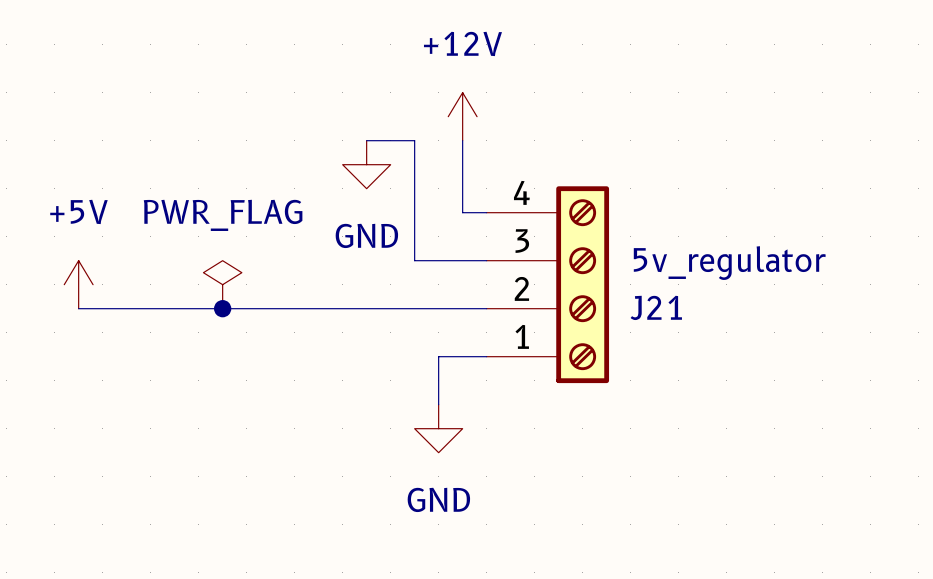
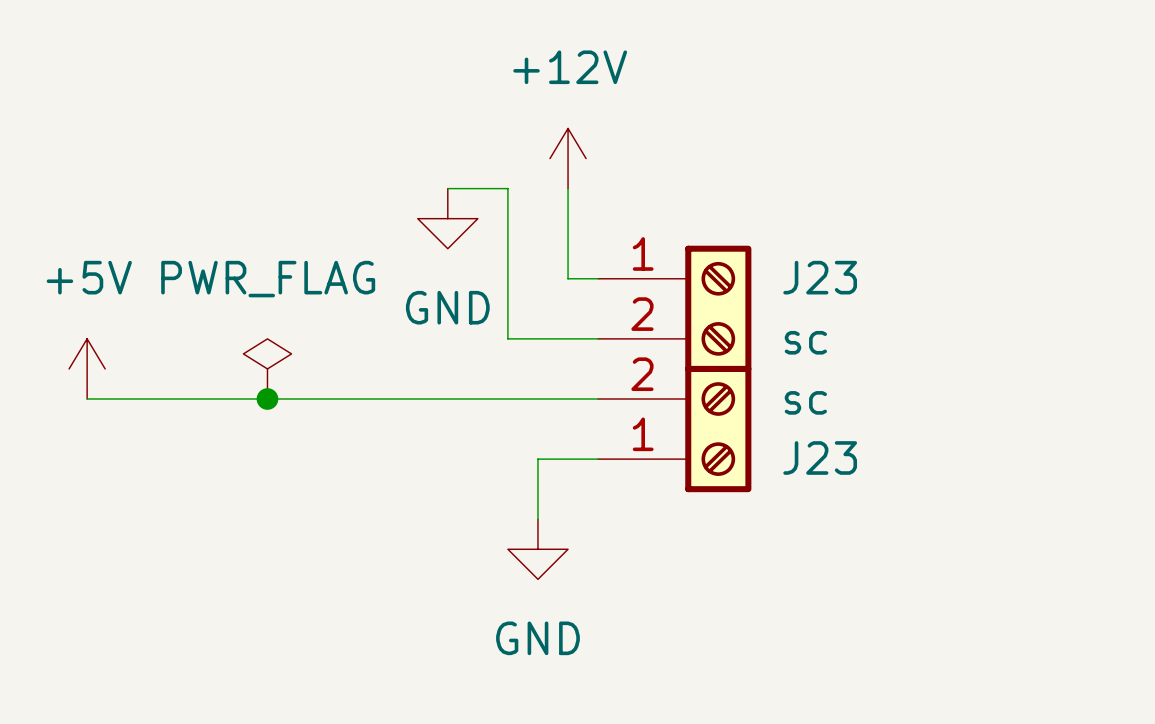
J23: none -> sc (674, 308)
J21: 5v_regulator (547, 284) -> none
J23: none -> sc (674, 429)

